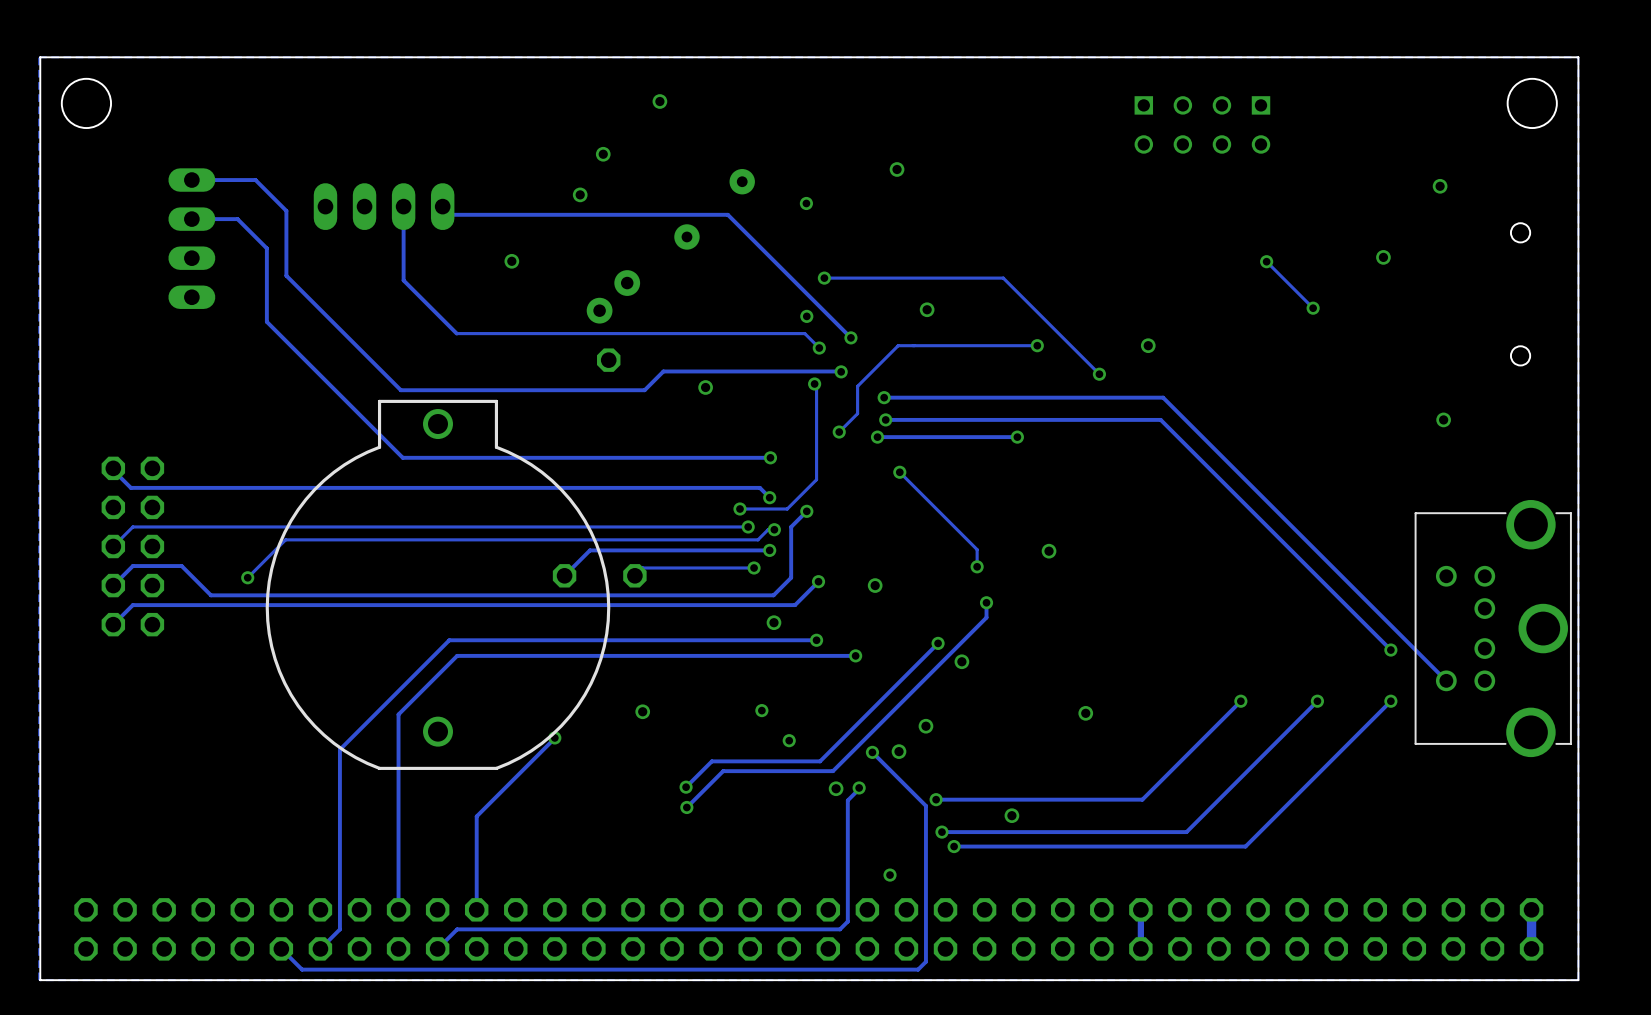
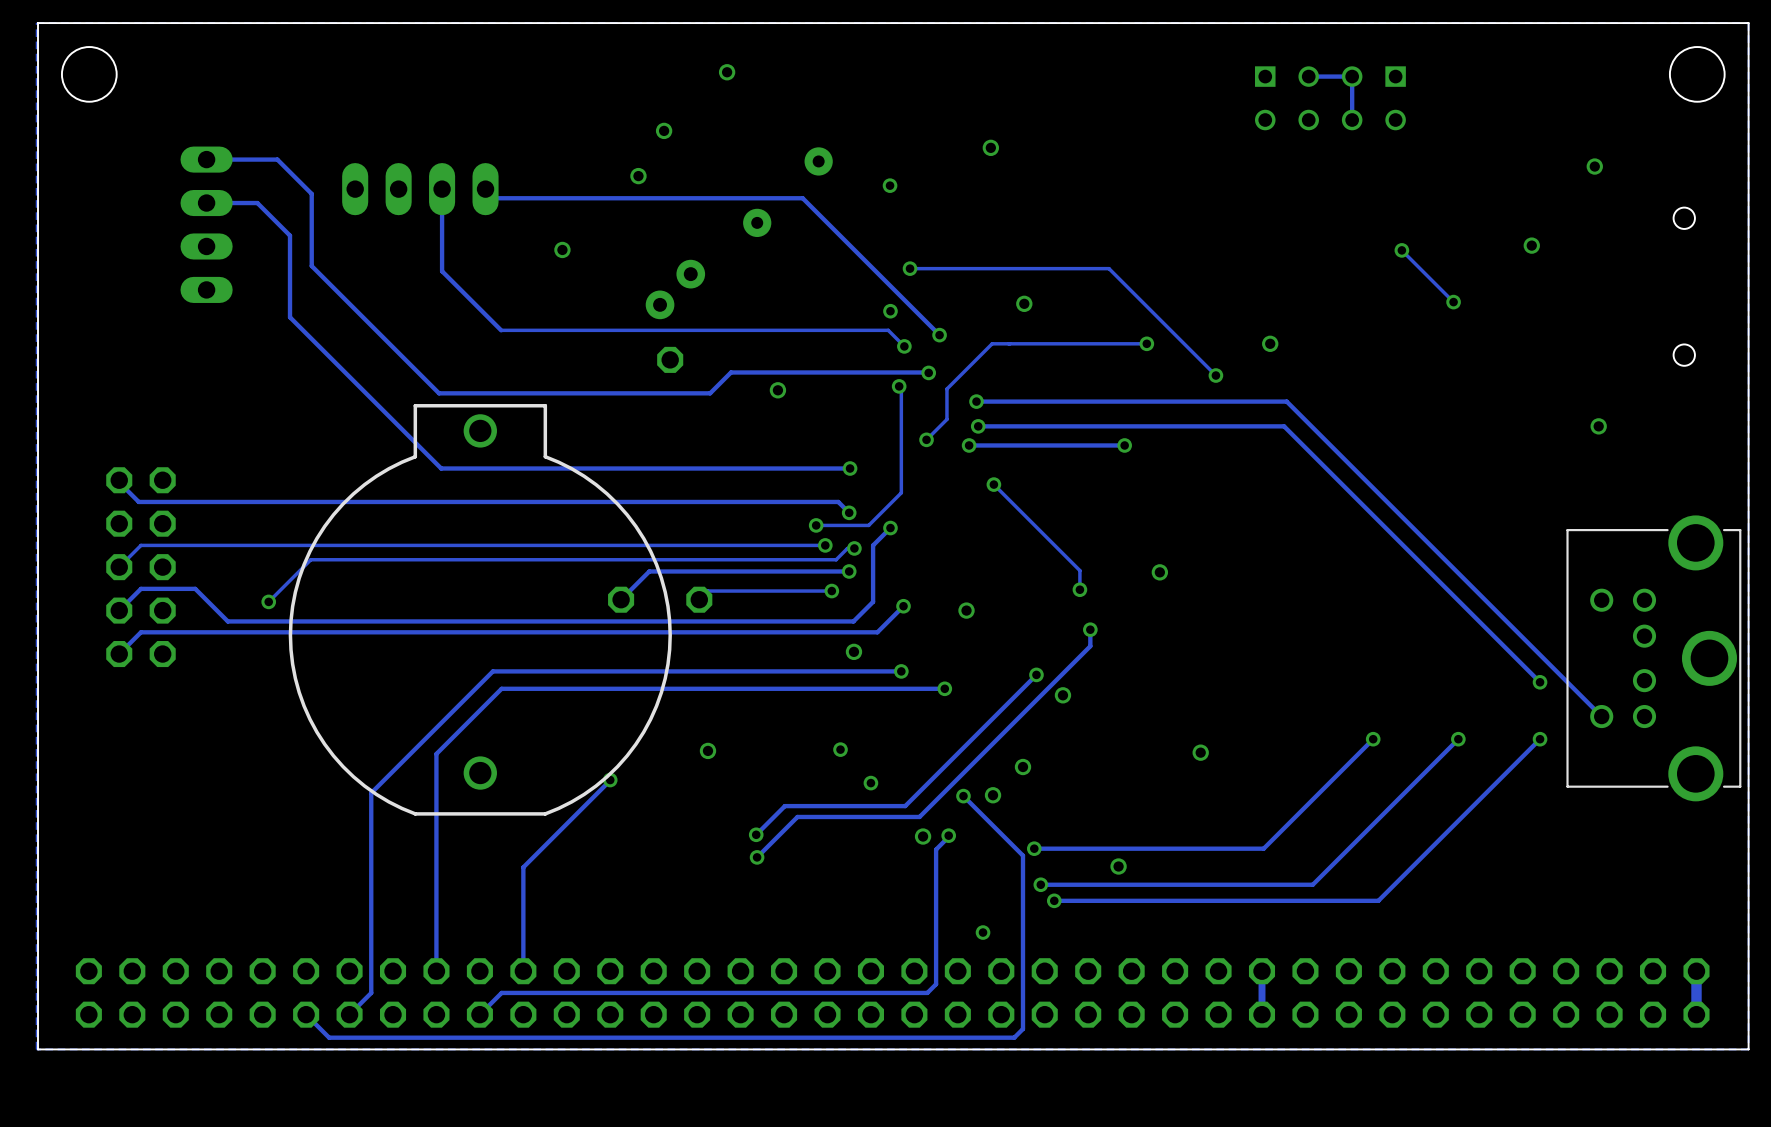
track: none -> (1308, 76) (1352, 76) (1352, 120)

